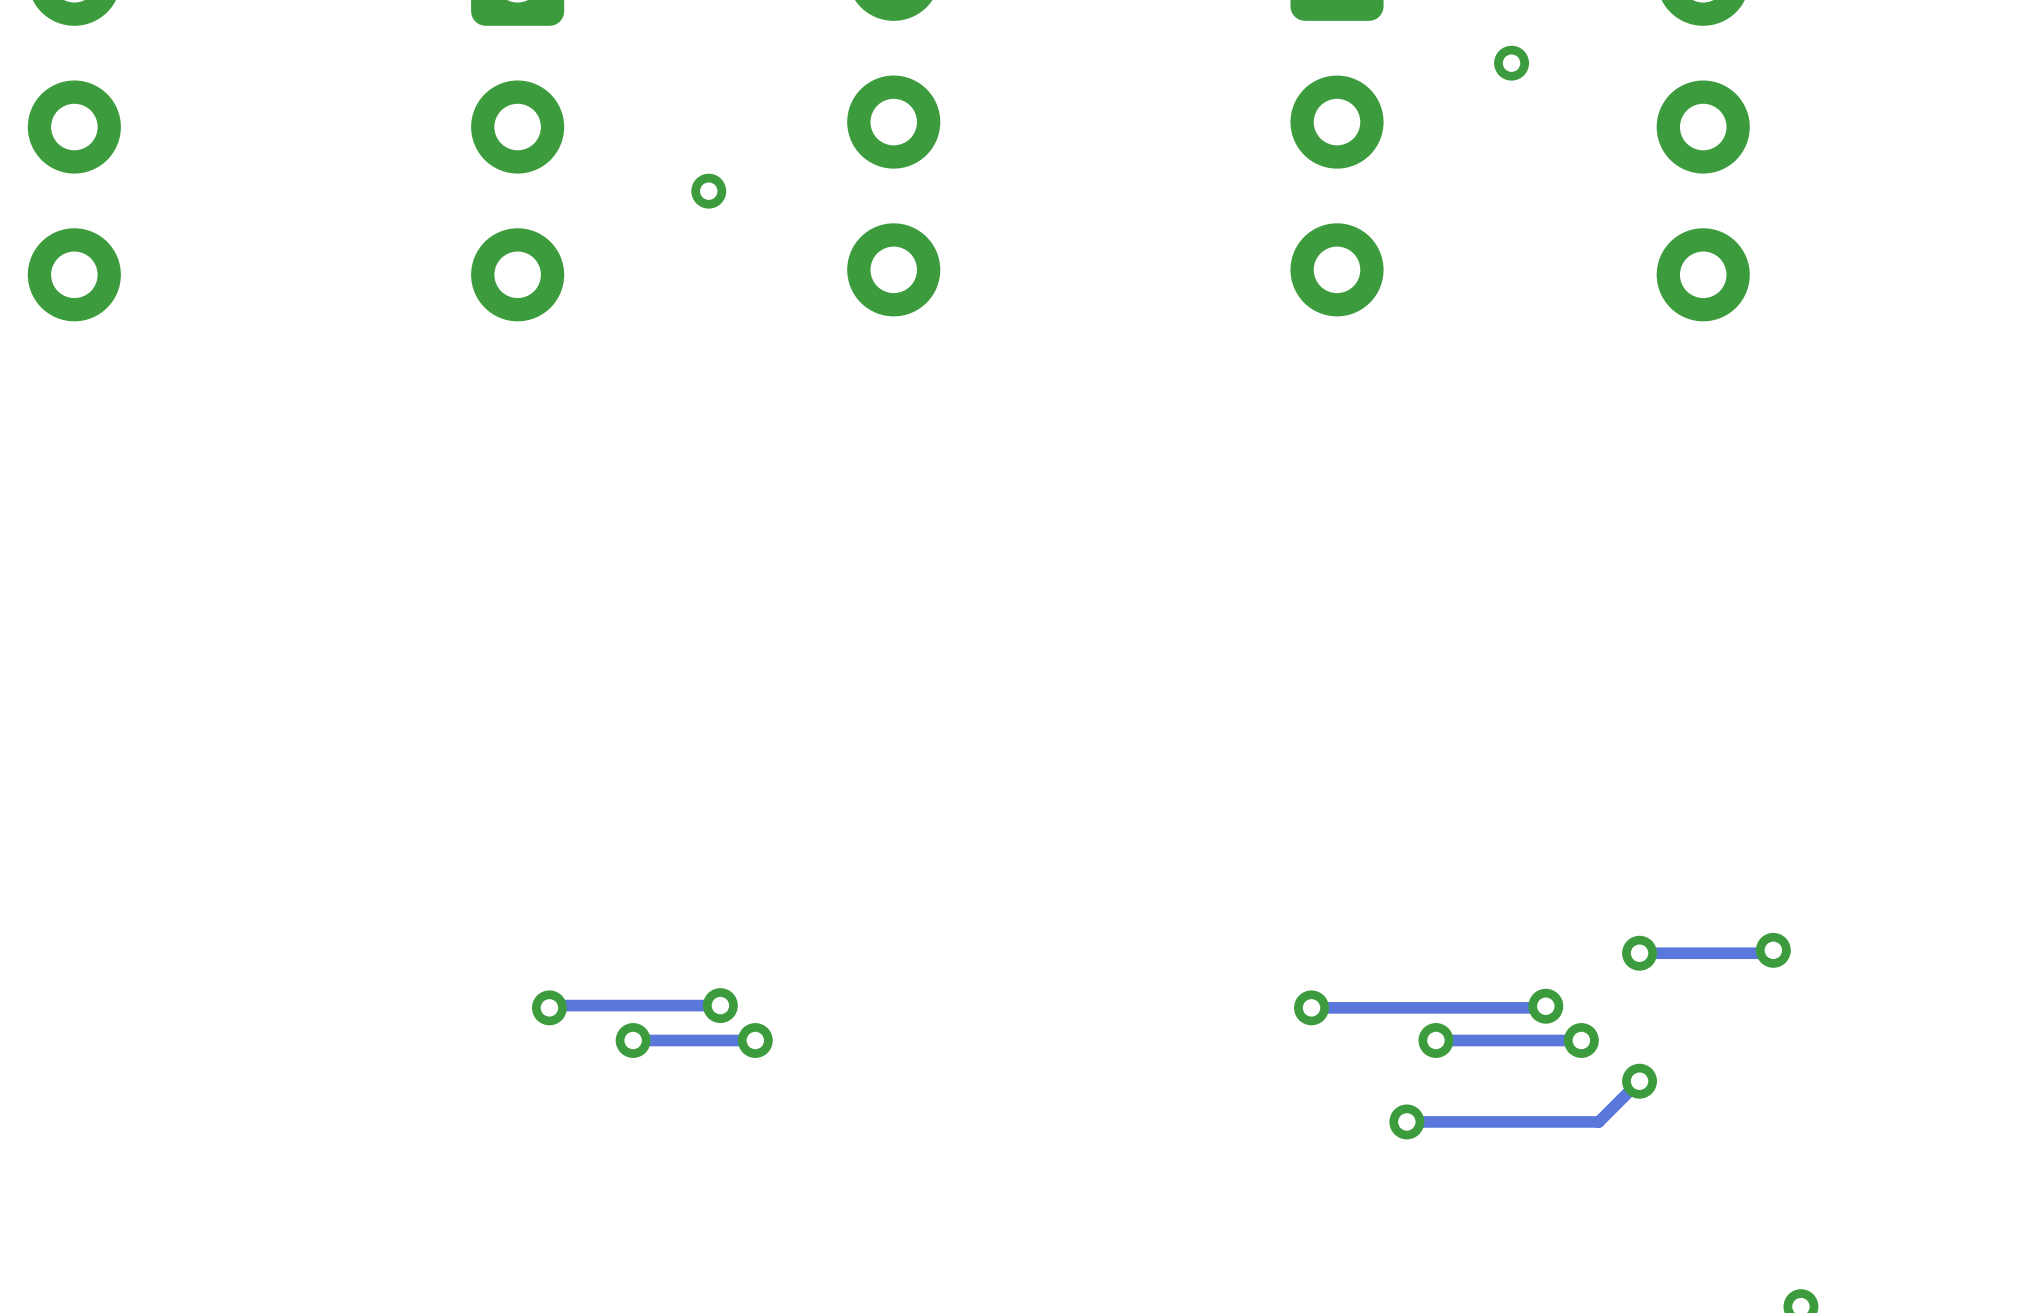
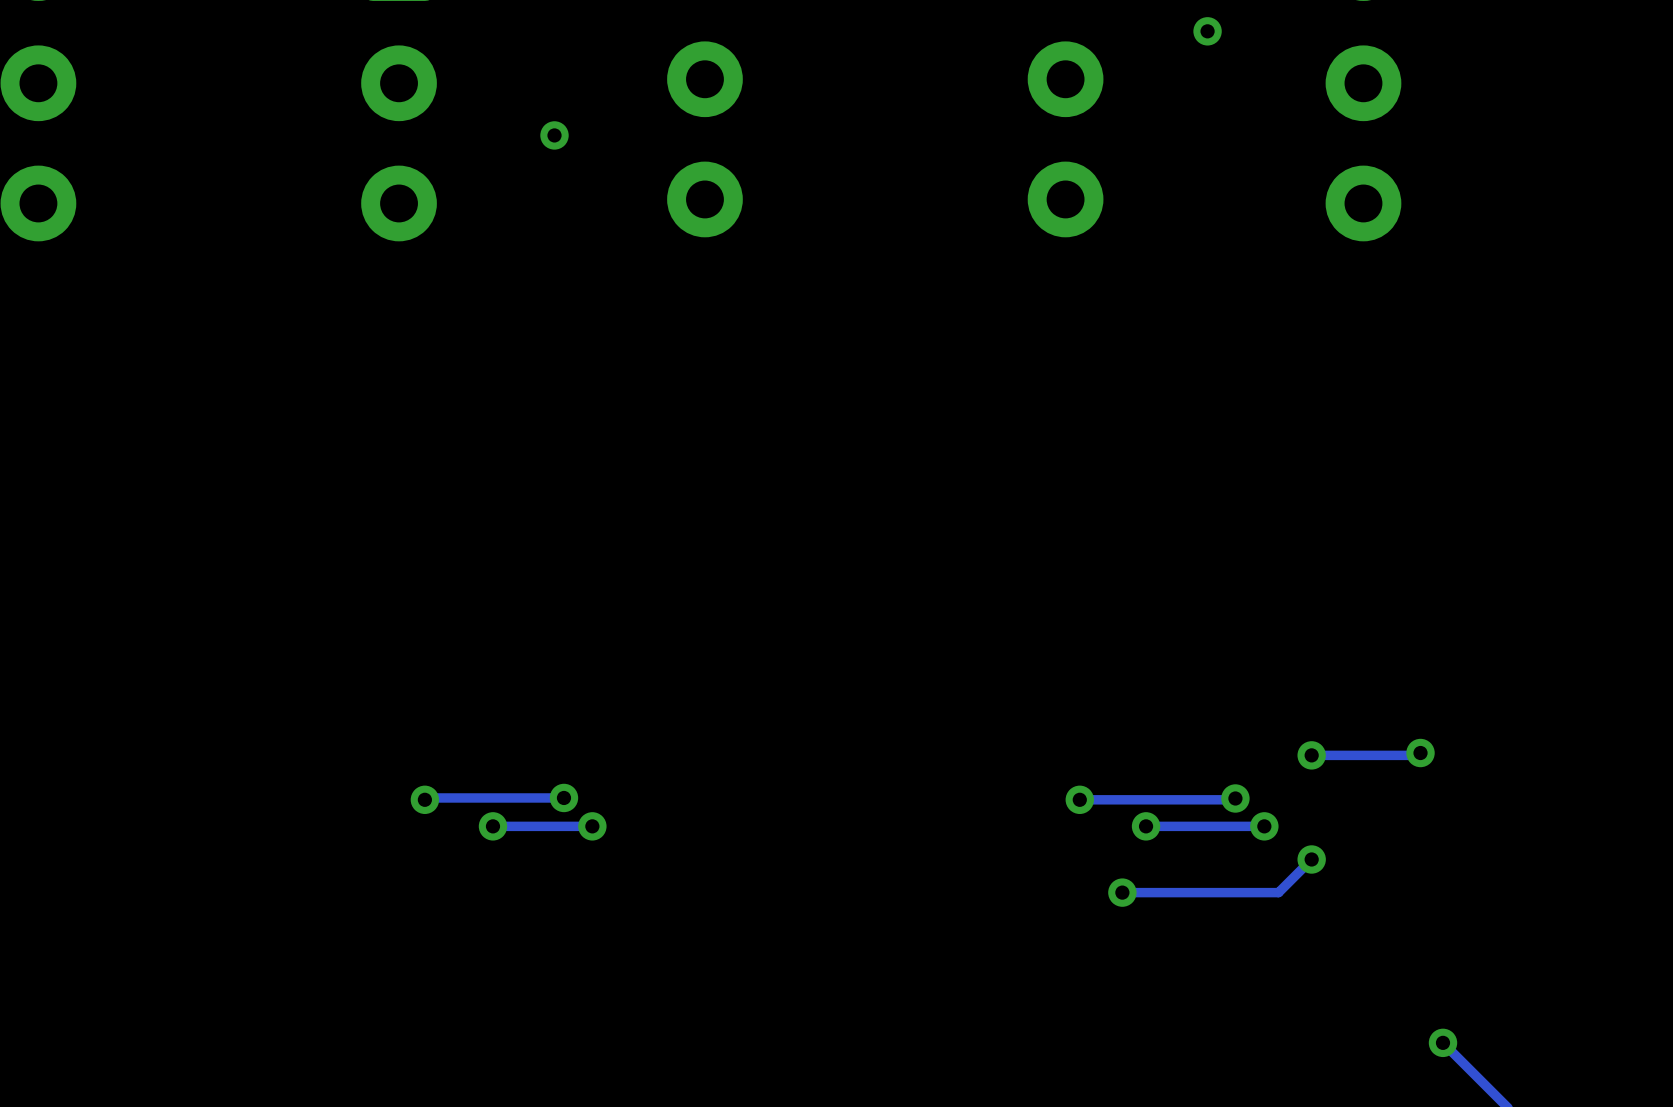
via position: (1311, 1007) -> (1079, 799)
track: (1354, 1007) (1311, 1007) -> none

